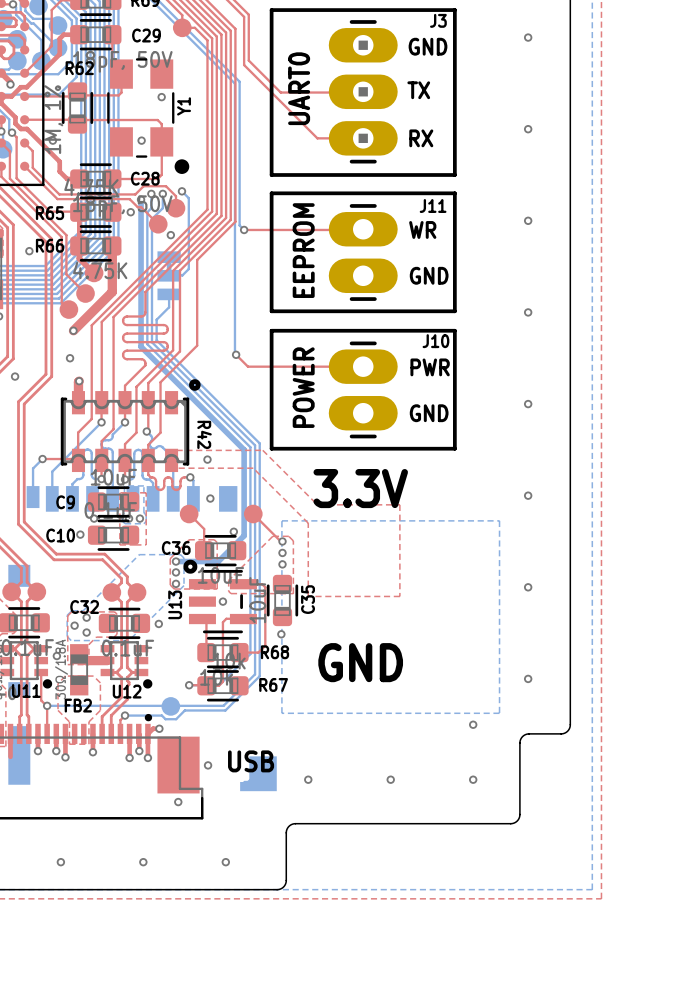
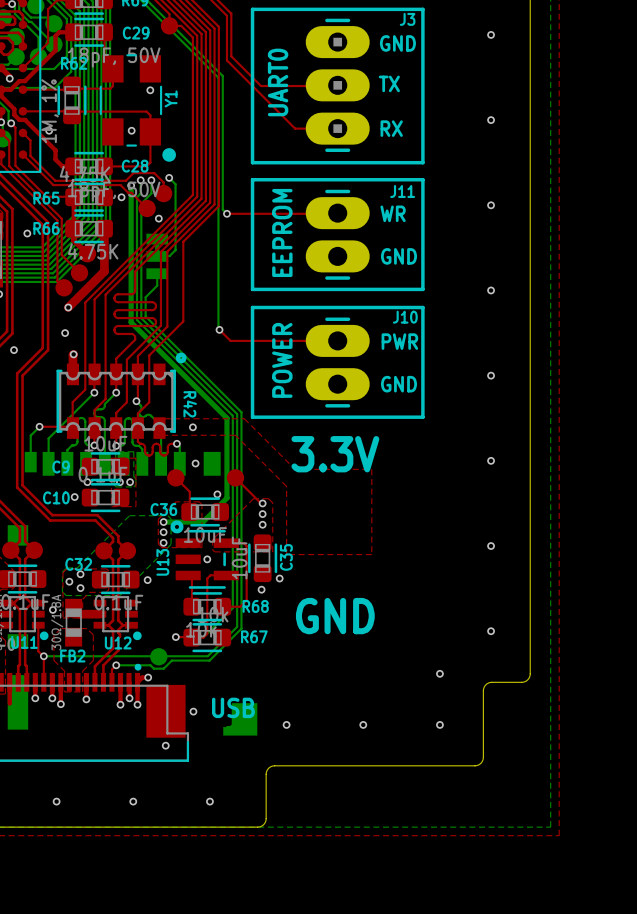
bottom zone outline: (281, 520) (499, 520) (499, 713) (281, 713) (281, 520) -> none
via: none -> (279, 578)

